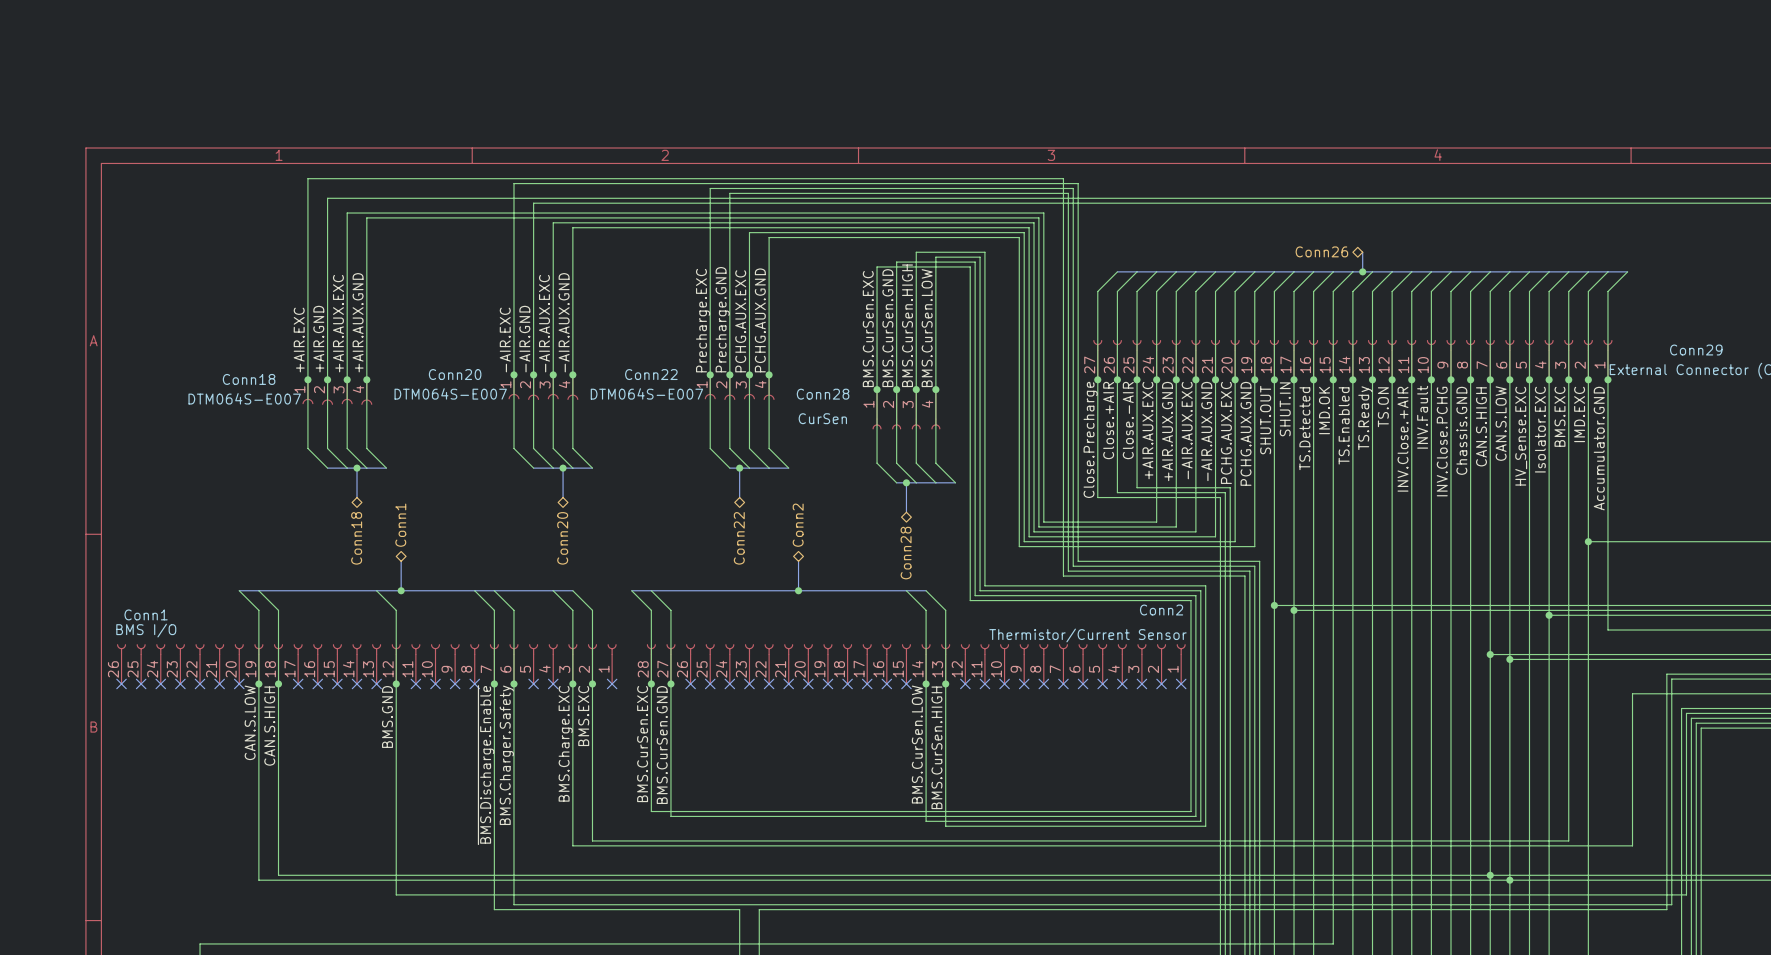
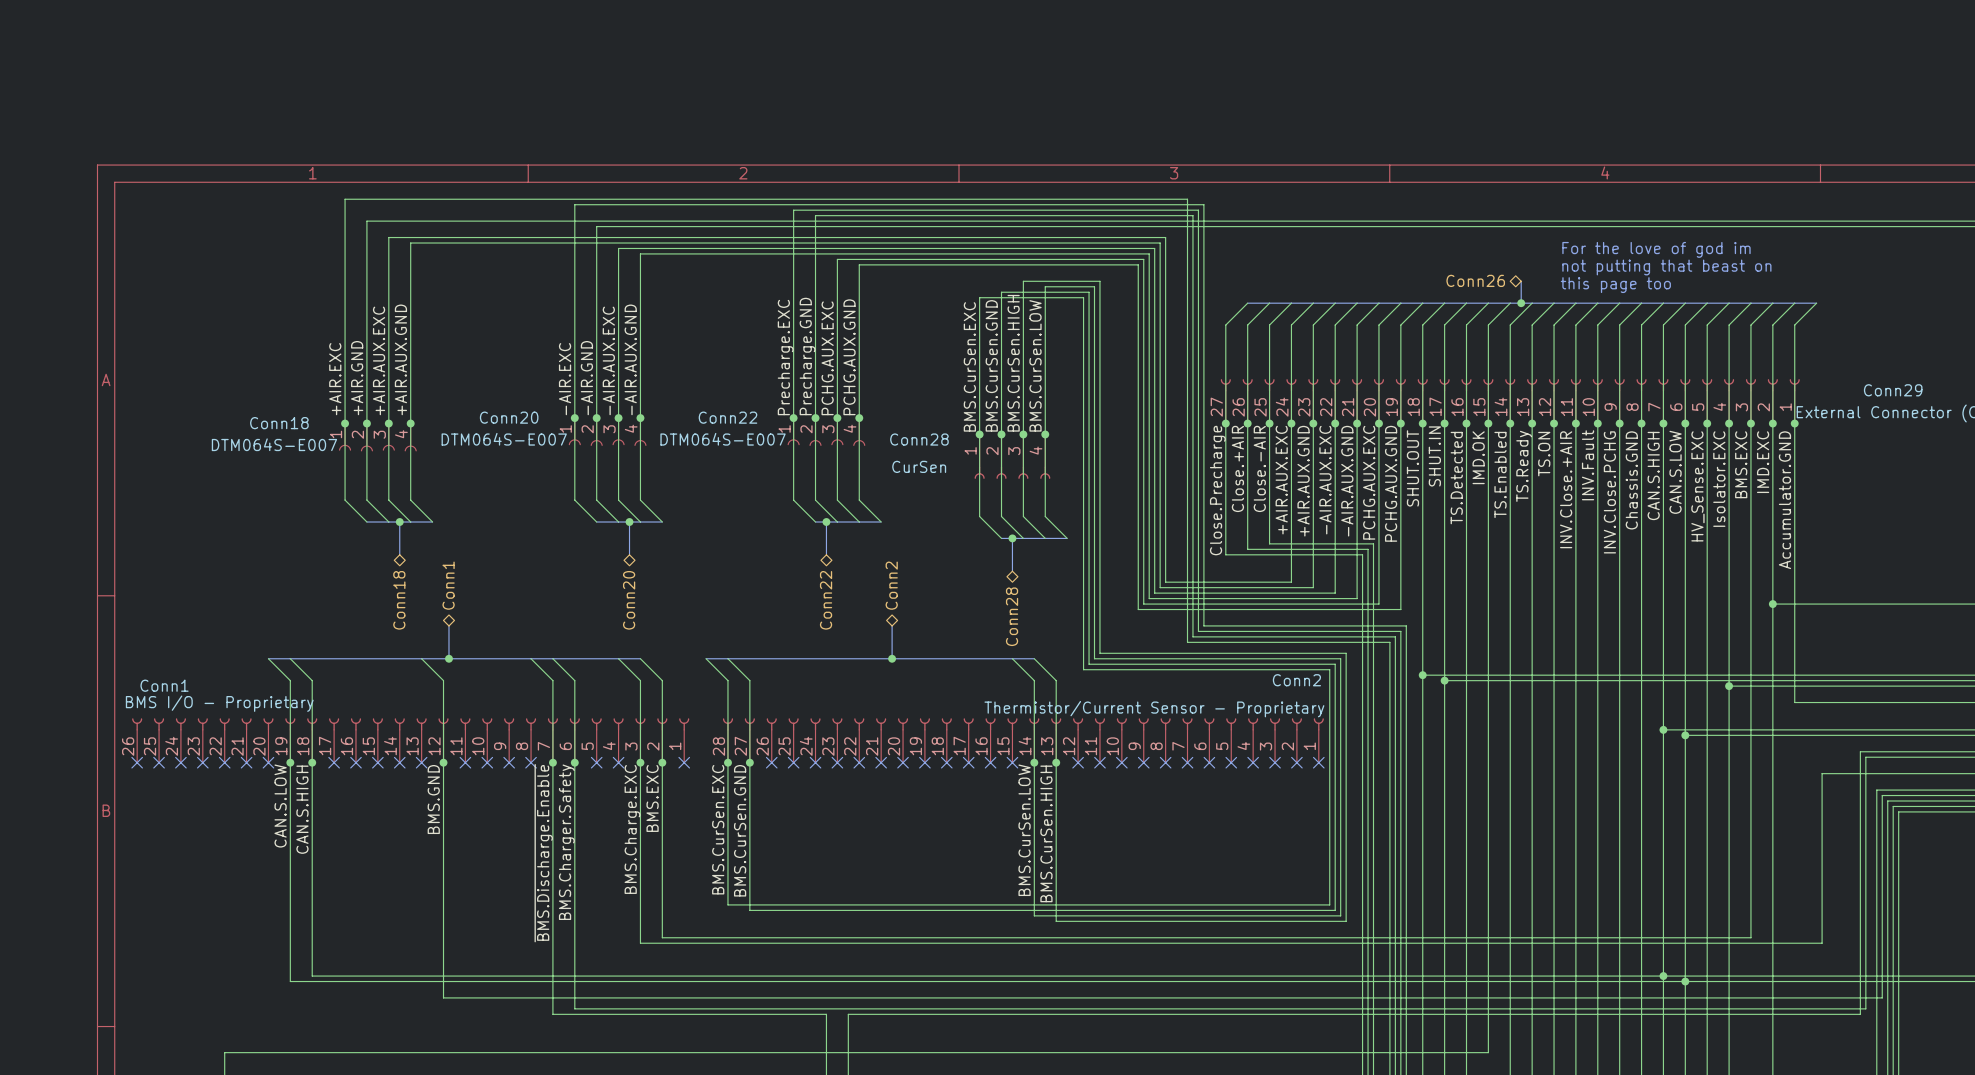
text: none -> For the love of god im (1656, 249)
text: none -> not putting that beast on (1666, 267)
text: none -> this page too (1615, 285)
Conn1 value: BMS I/O (146, 630) -> BMS I/O - Proprietary (219, 703)
Conn2 value: Thermistor/Current Sensor (1087, 635) -> Thermistor/Current Sensor - Proprietary (1154, 709)

